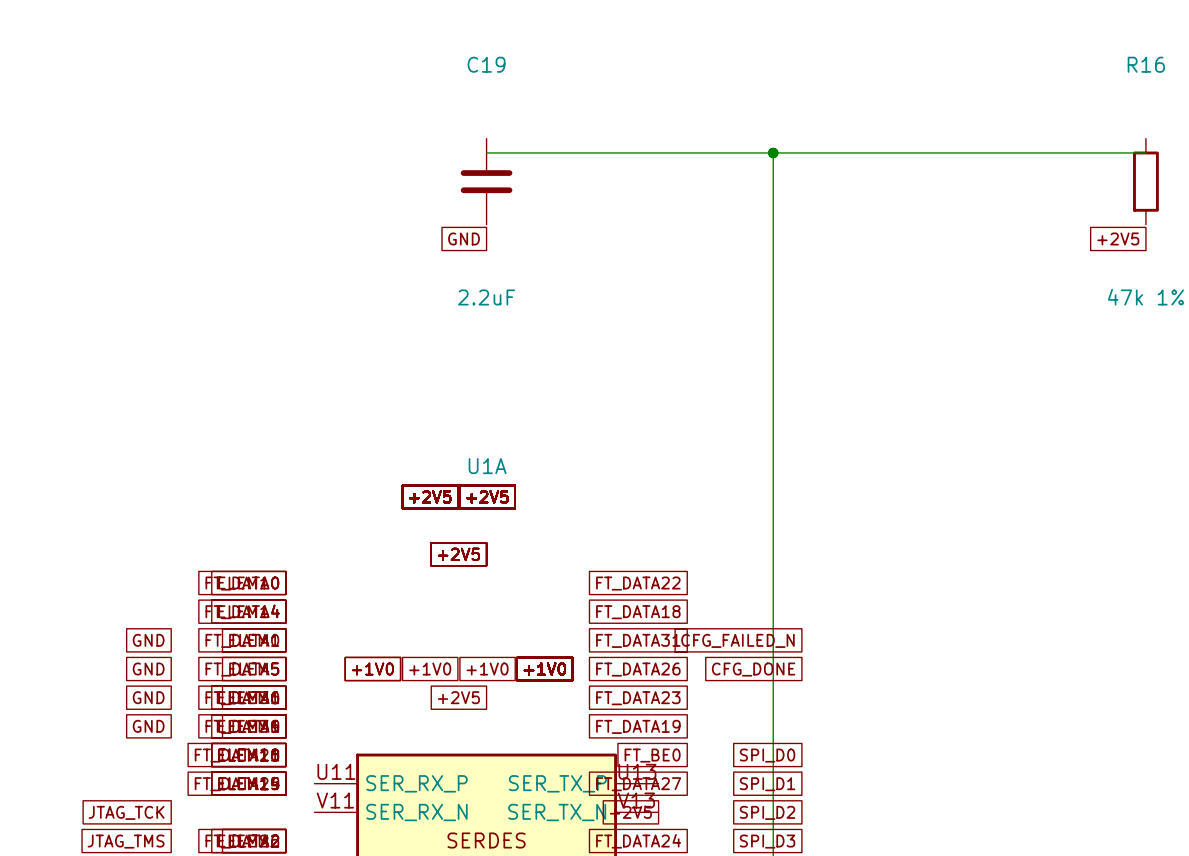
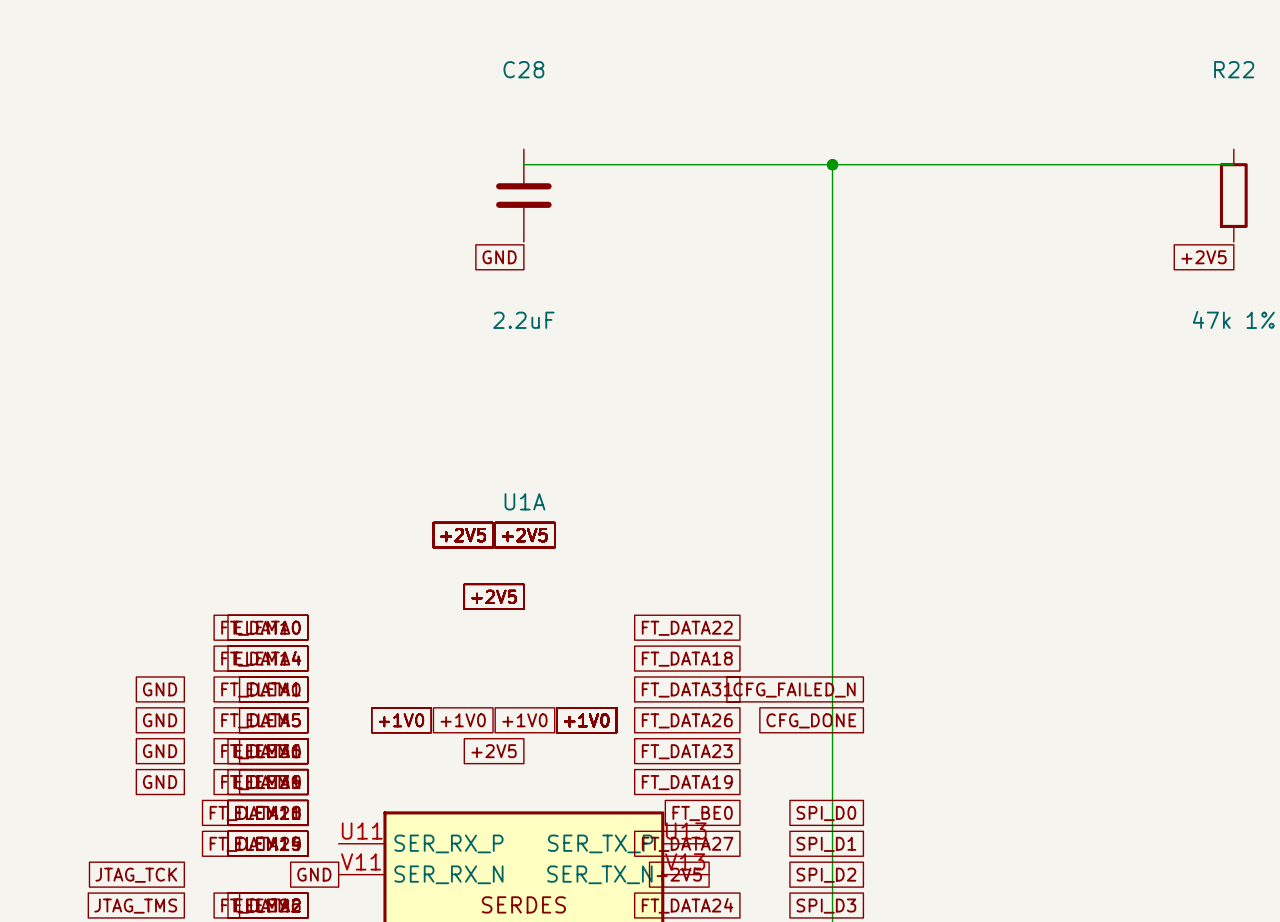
C19 name: C19 (486, 64) -> C28 (523, 69)
R16 name: R16 (1146, 64) -> R22 (1234, 69)
global label: none -> GND (314, 874)

